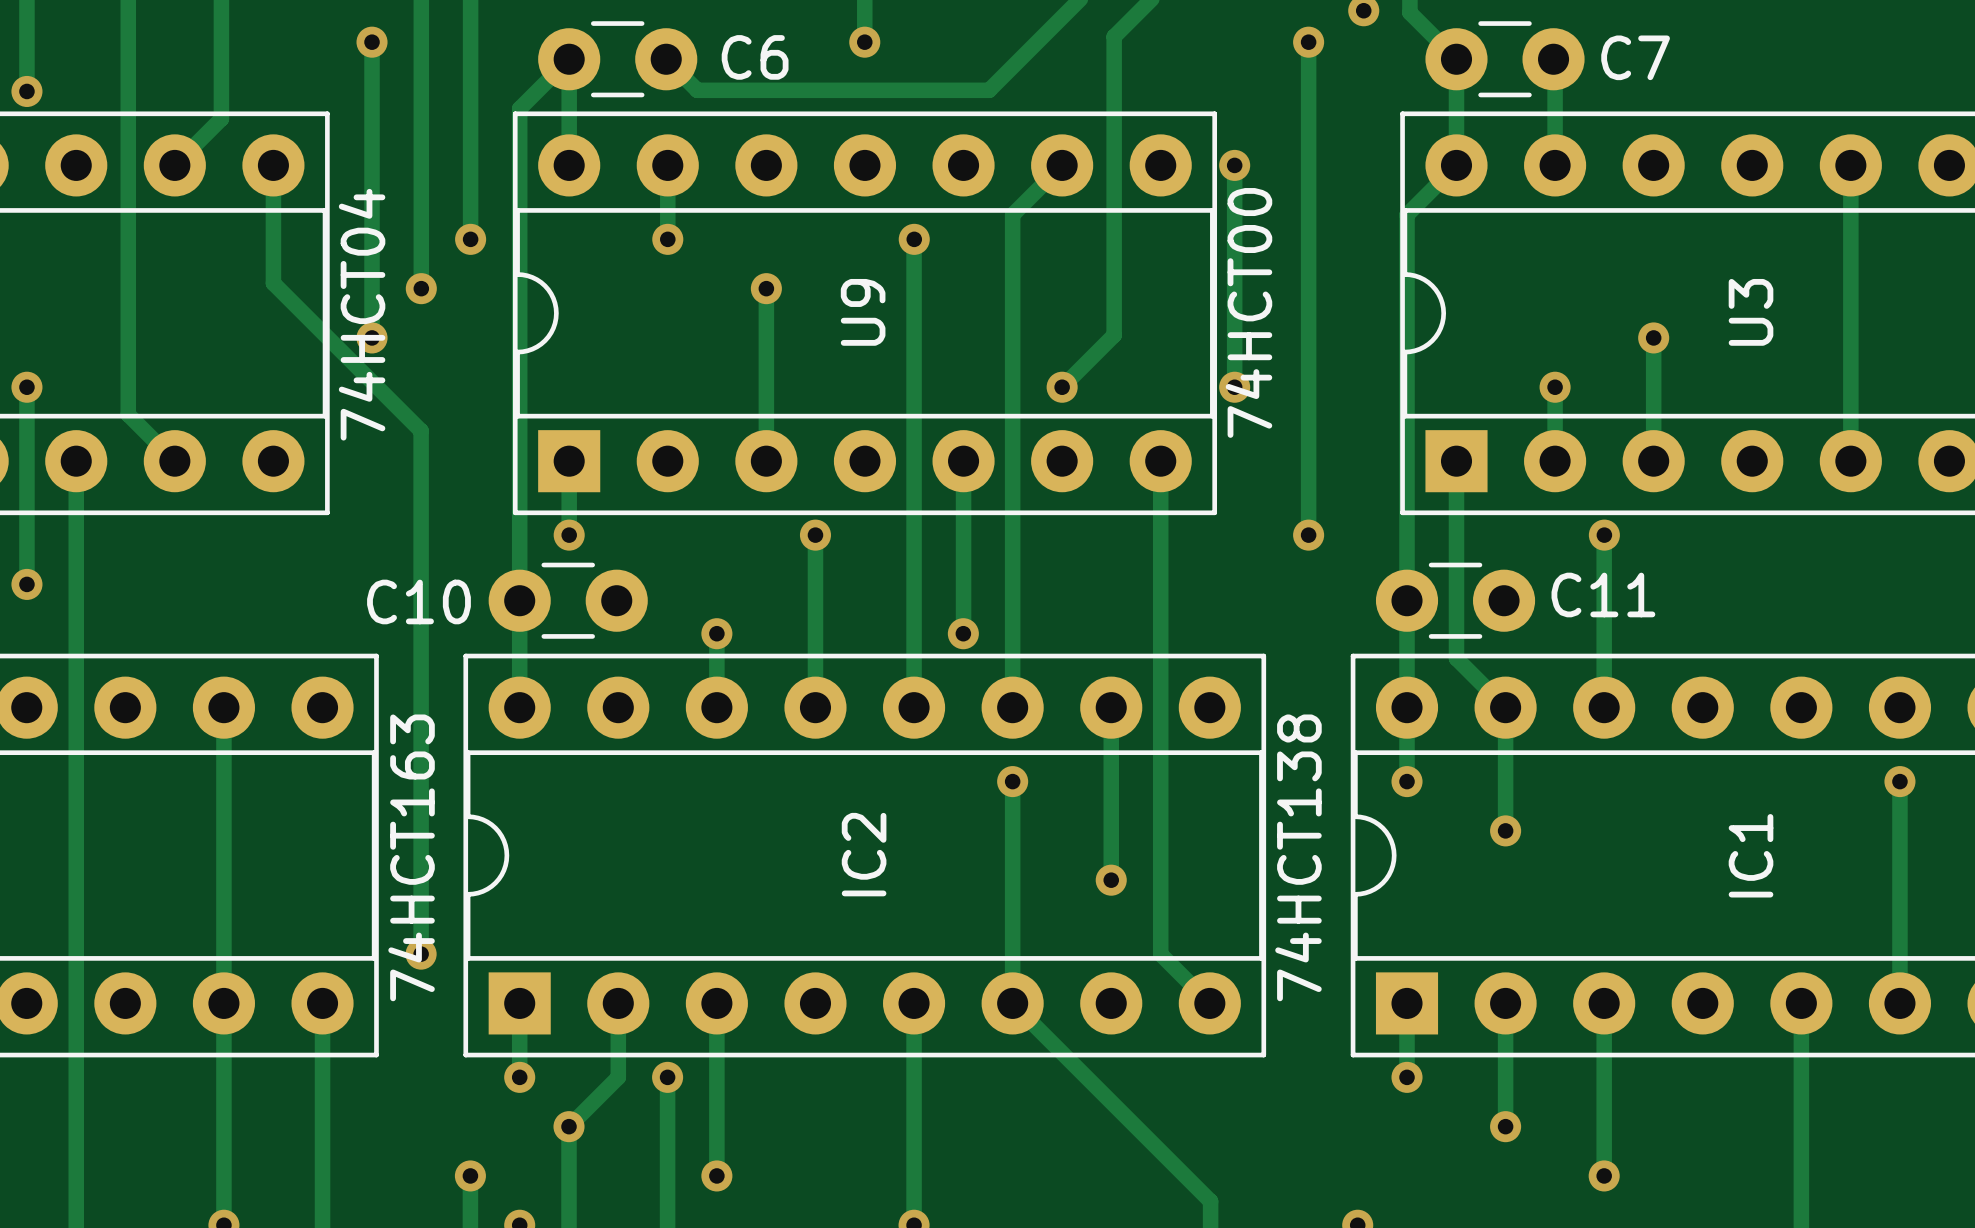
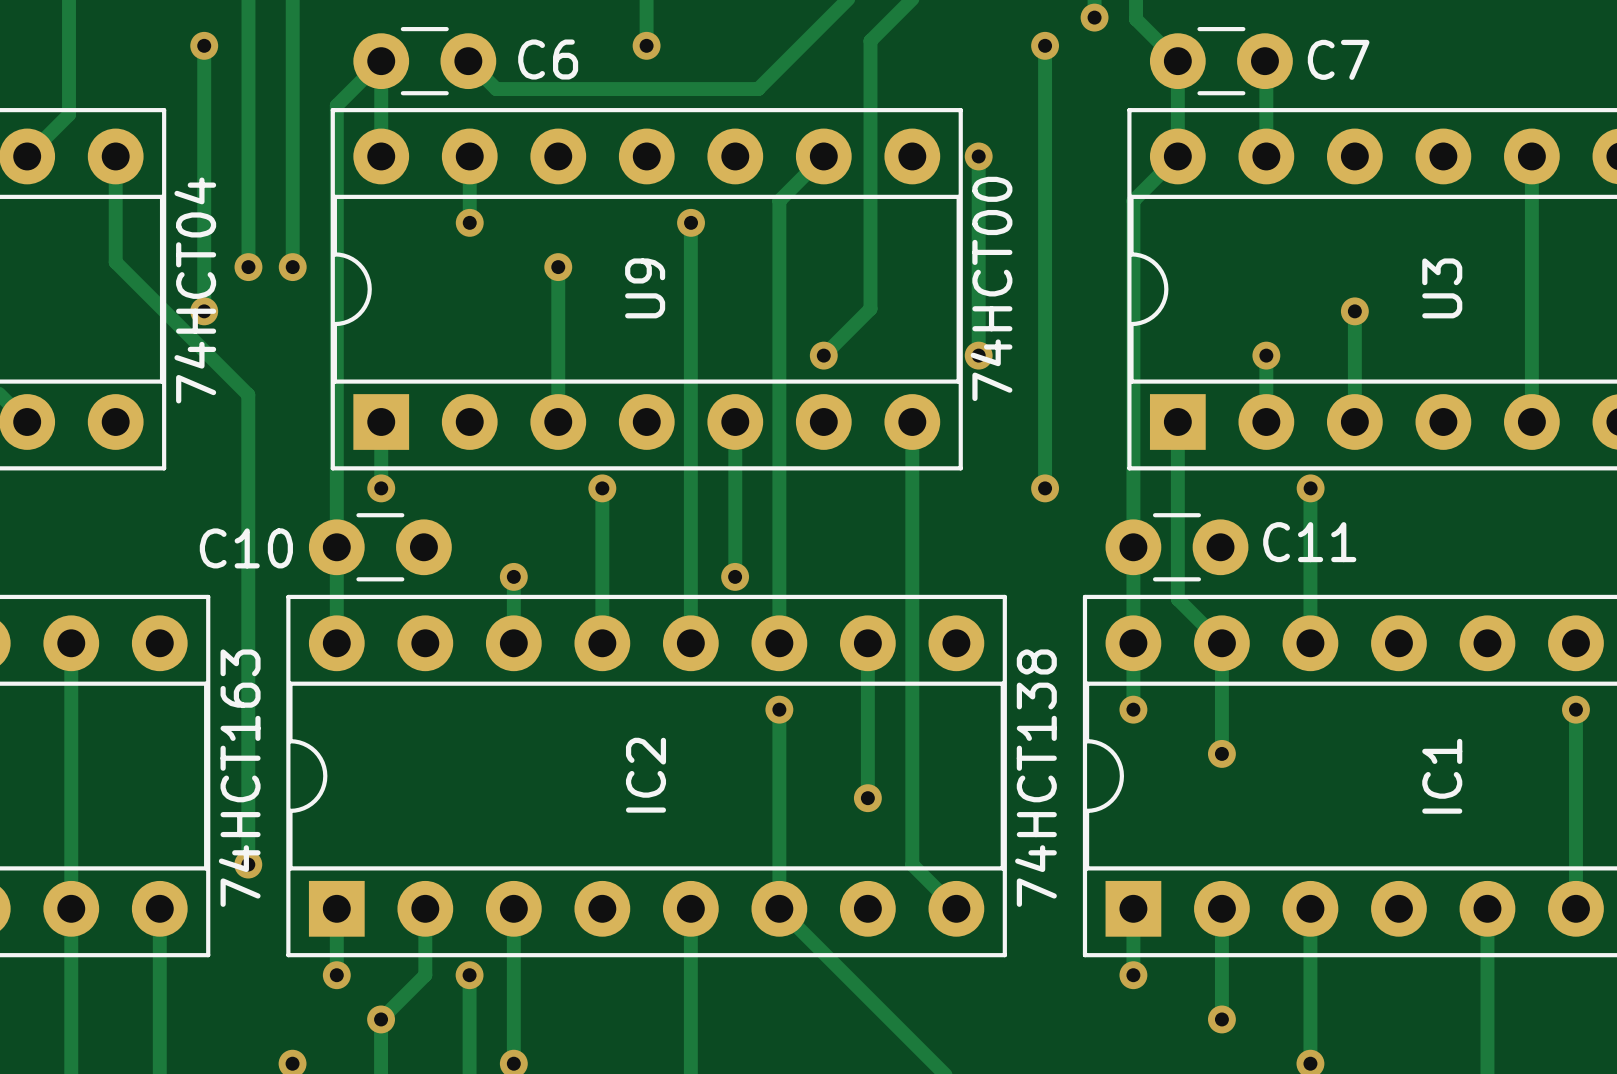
track: none -> (292, 222) (292, 267)
via position: (470, 239) -> (292, 267)

